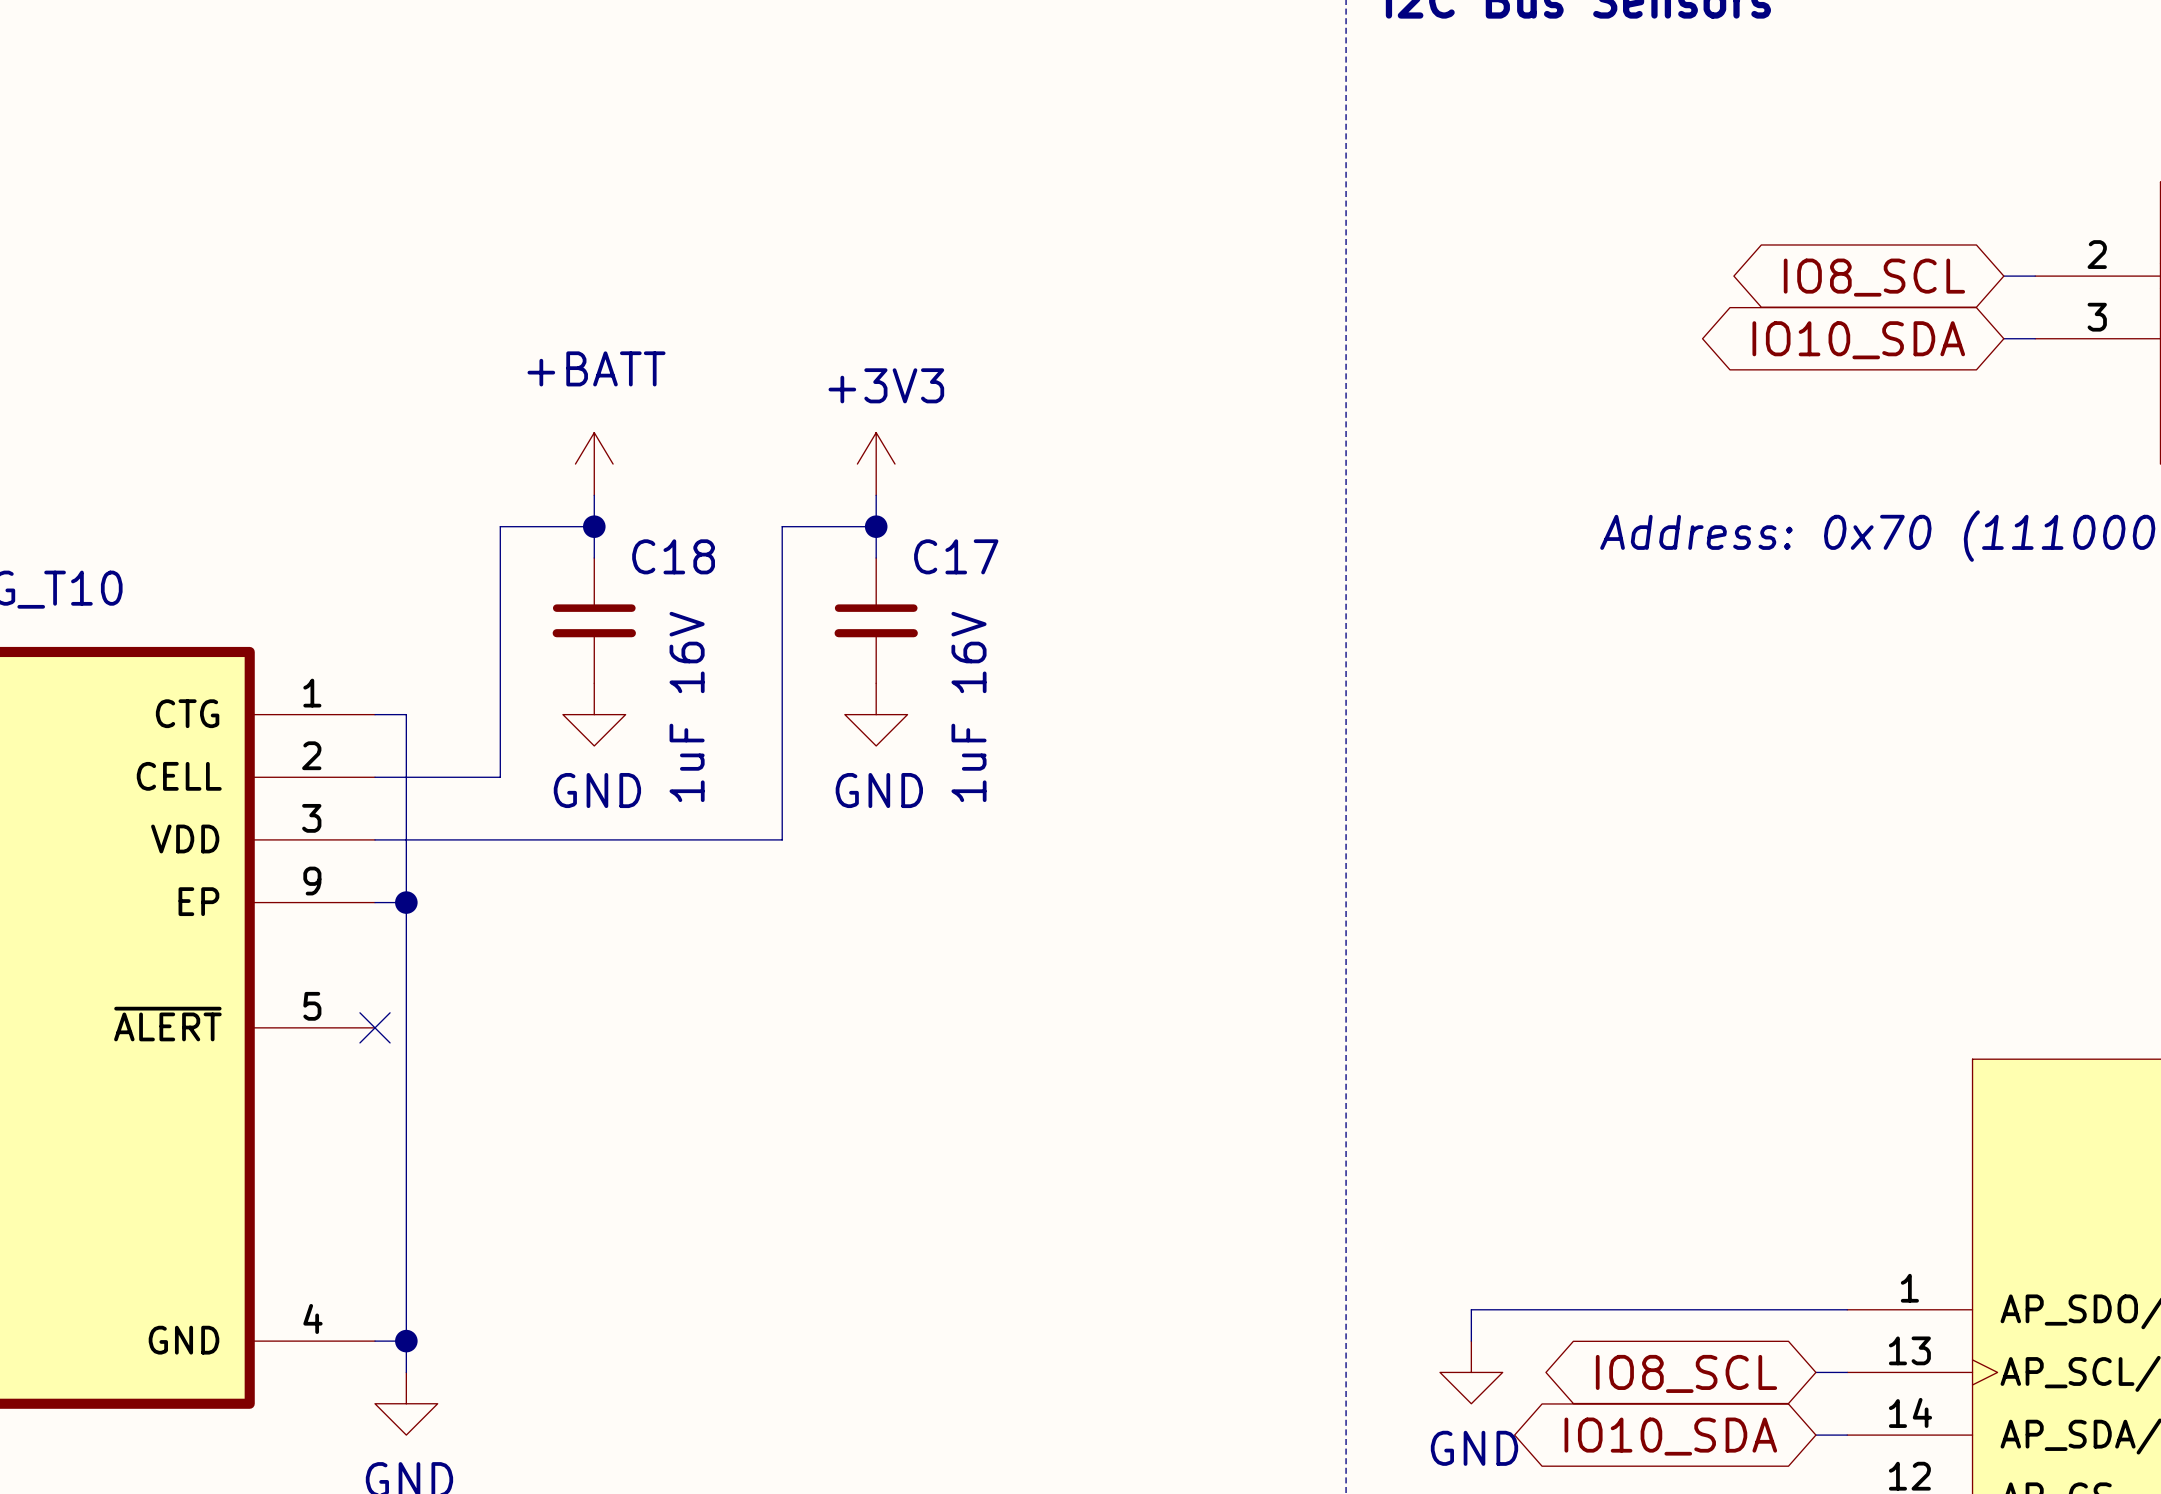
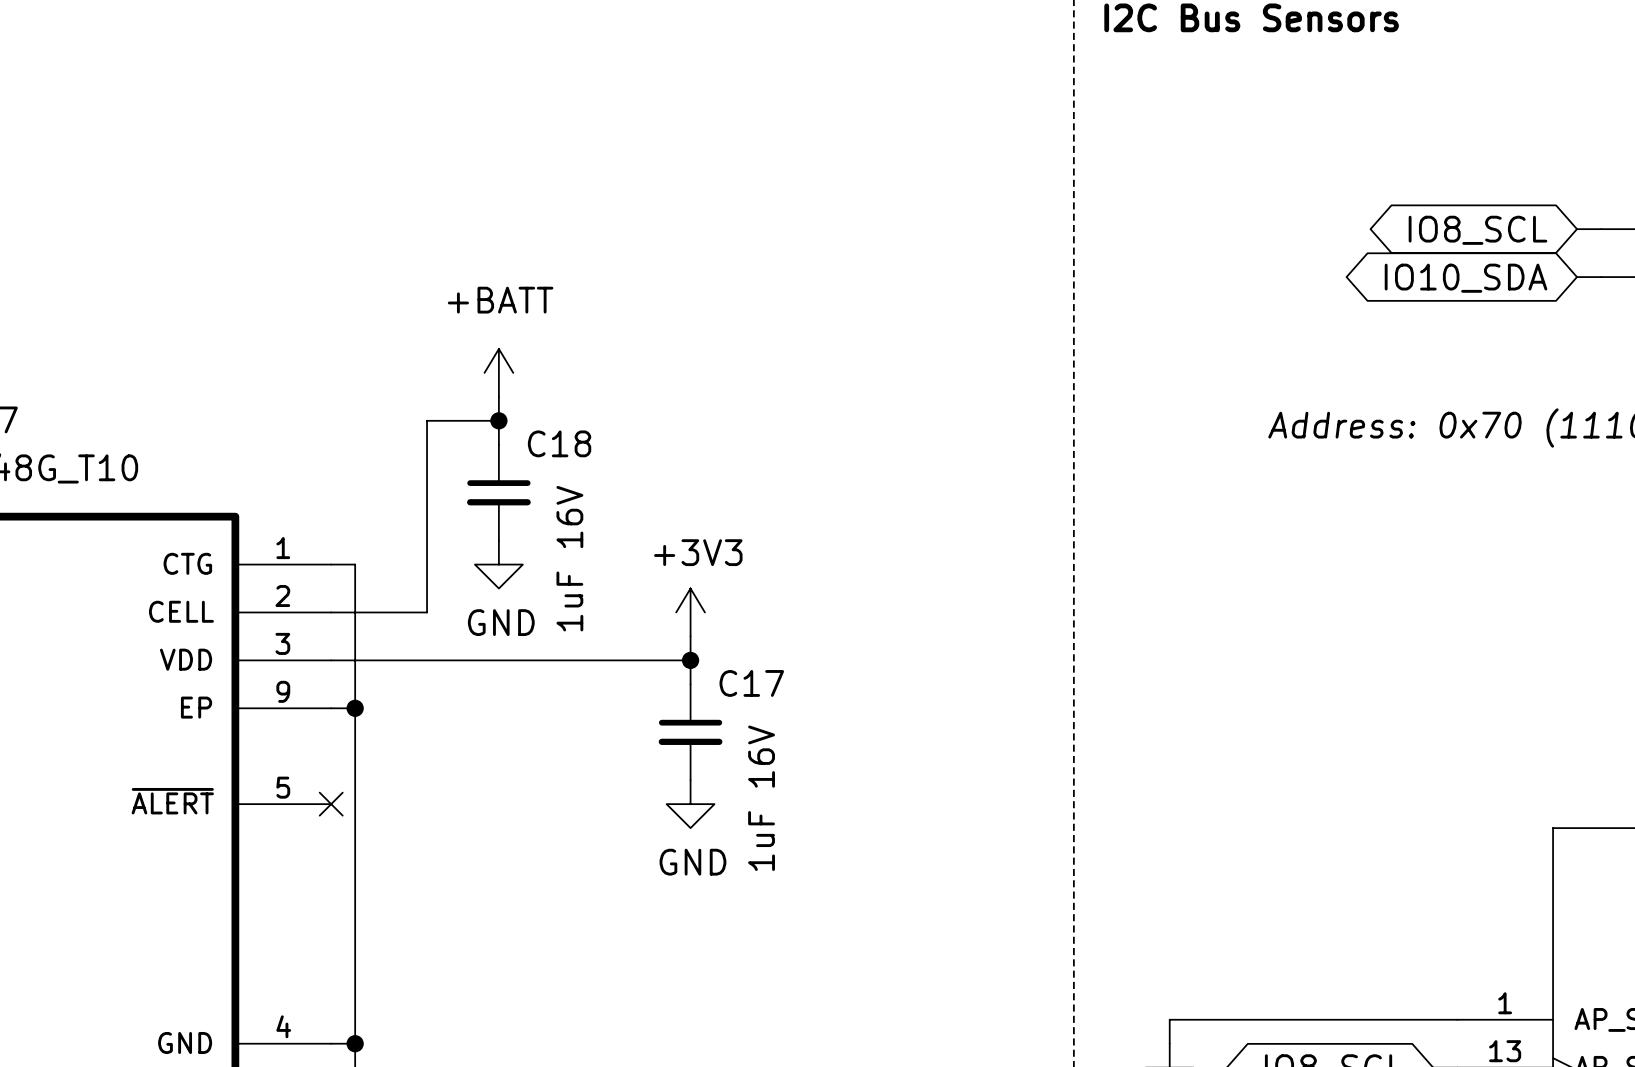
power symbol position: +3V3 (876, 464) -> +3V3 (690, 612)
wire: (876, 495) (876, 558) -> (690, 636) (690, 684)
wire: (876, 526) (782, 526) (782, 839) -> (690, 660) (642, 660)
junction: (876, 526) -> none
C17 position: (876, 620) -> (690, 732)
power symbol position: GND (876, 714) -> GND (690, 804)
junction: none -> (690, 660)

